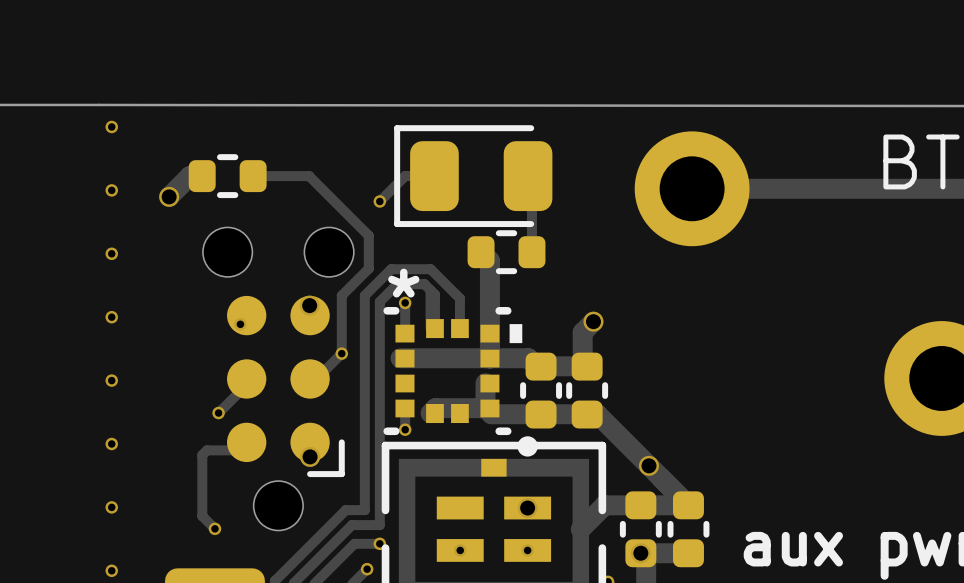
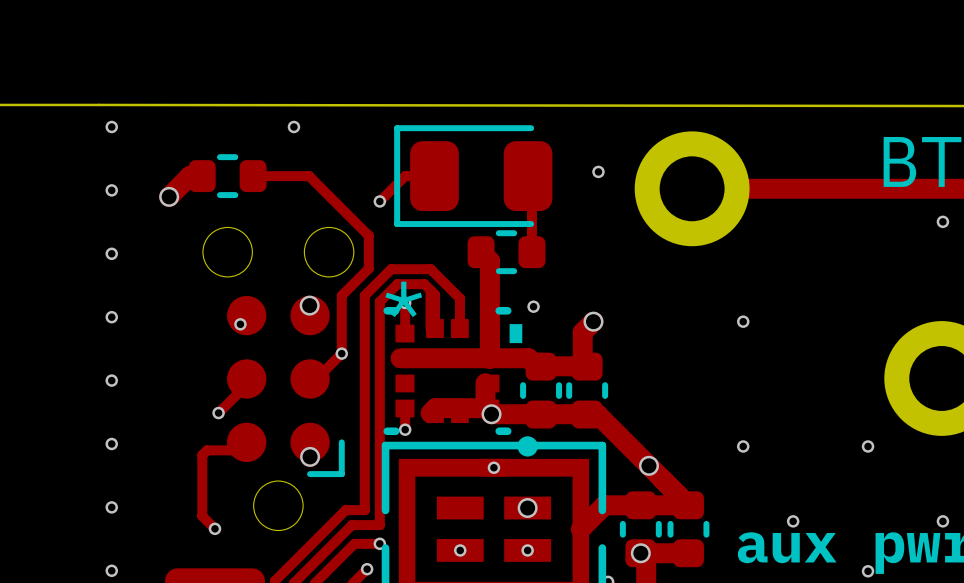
via: none -> (293, 126)
via: none -> (598, 171)
via: none -> (942, 221)
via: none -> (533, 306)
via: none -> (743, 321)
via: none -> (491, 414)
via: none -> (743, 446)
via: none -> (868, 446)
via: none -> (493, 467)
via: none -> (793, 521)
via: none -> (942, 521)
via: none -> (868, 571)

